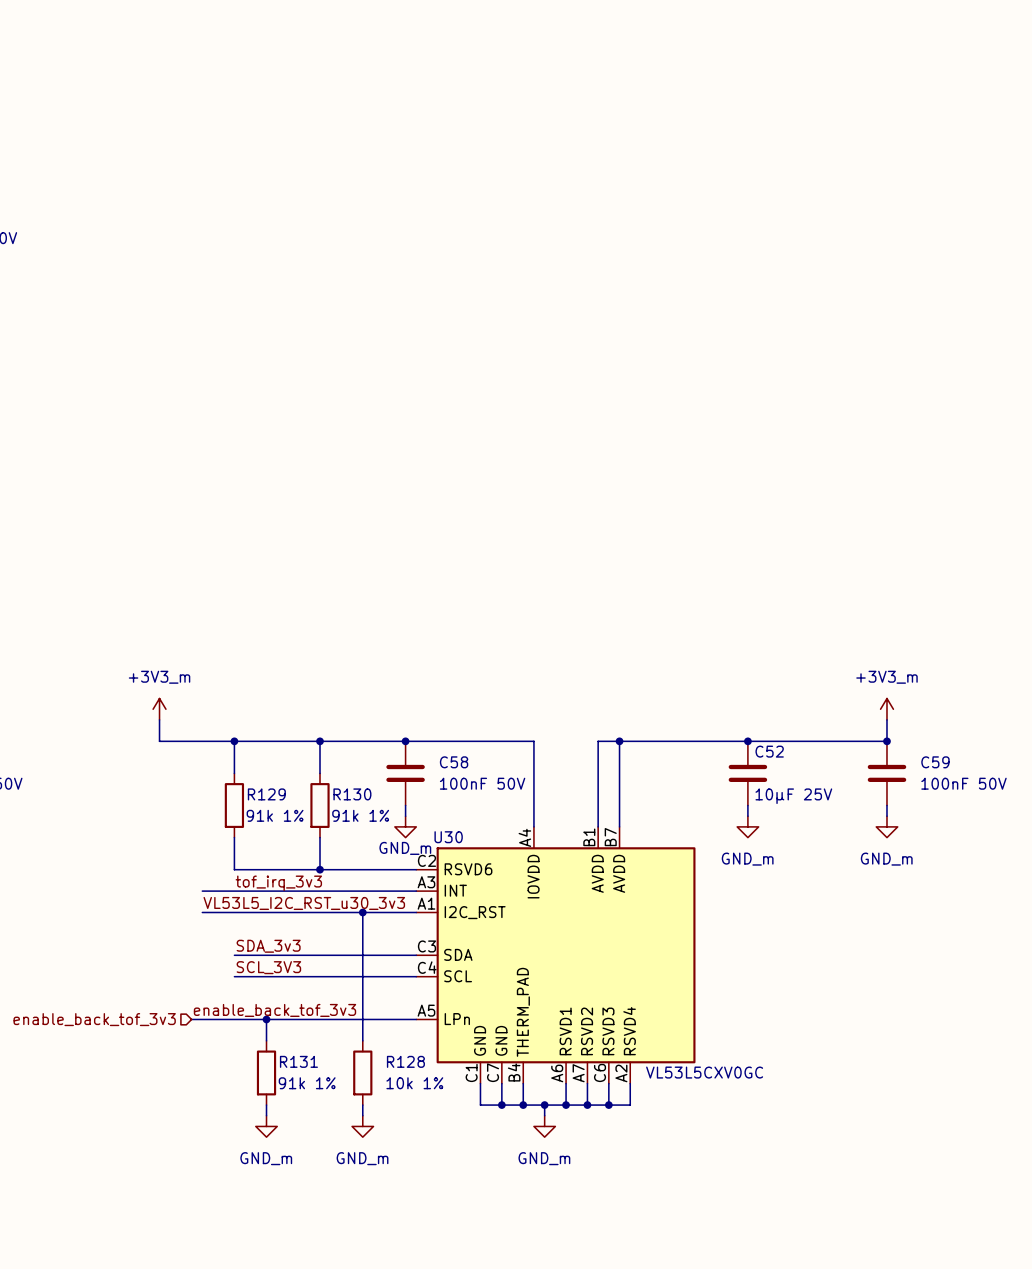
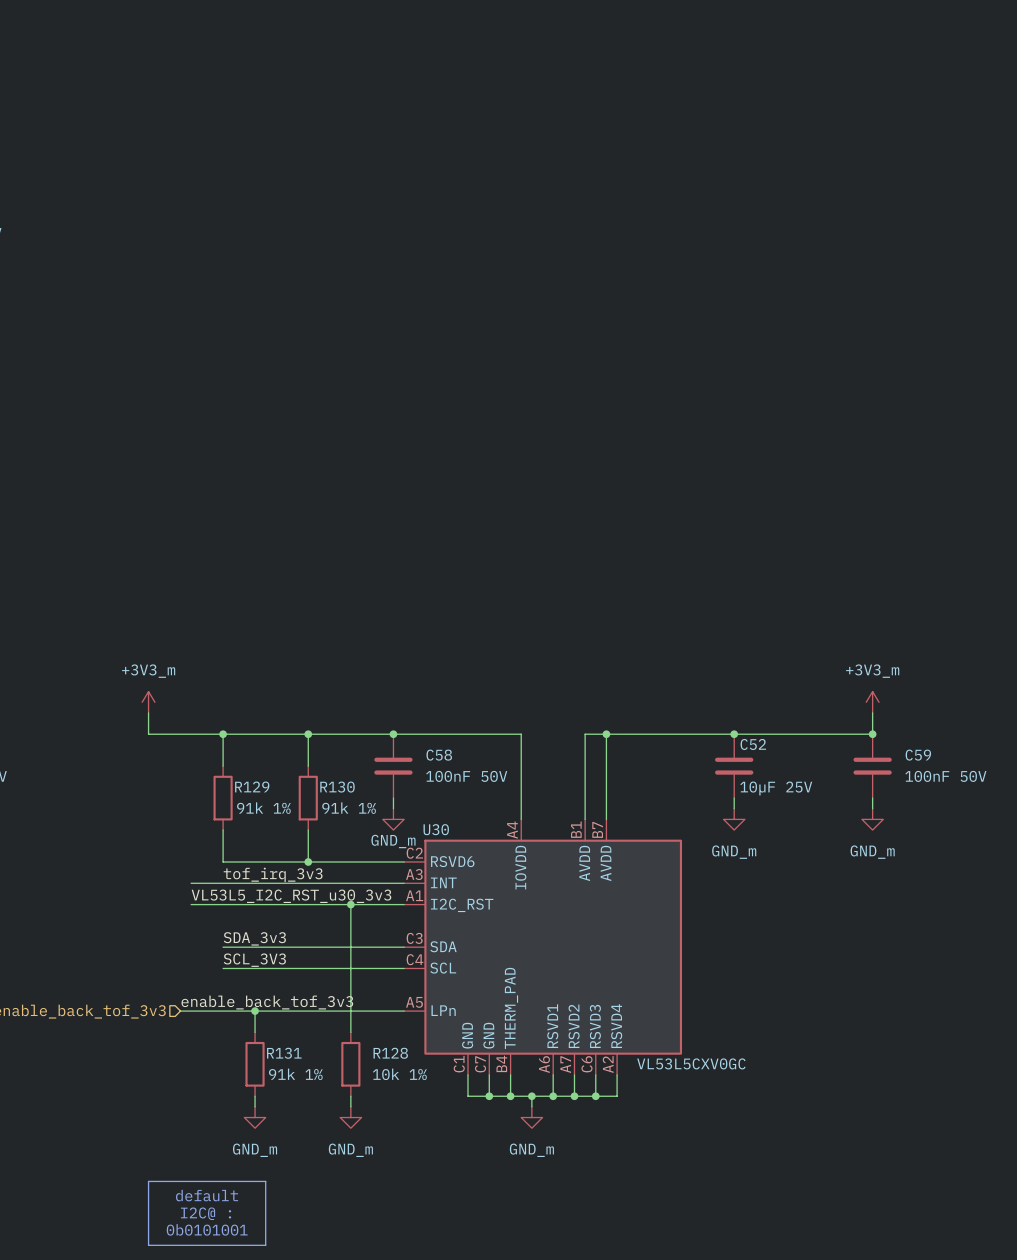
line: none -> (148, 1181) (265, 1181) (265, 1245) (148, 1245) (148, 1181)
text: none -> default (207, 1195)
text: none -> I2C@ : (206, 1213)
text: none -> 0b0101001 (207, 1229)

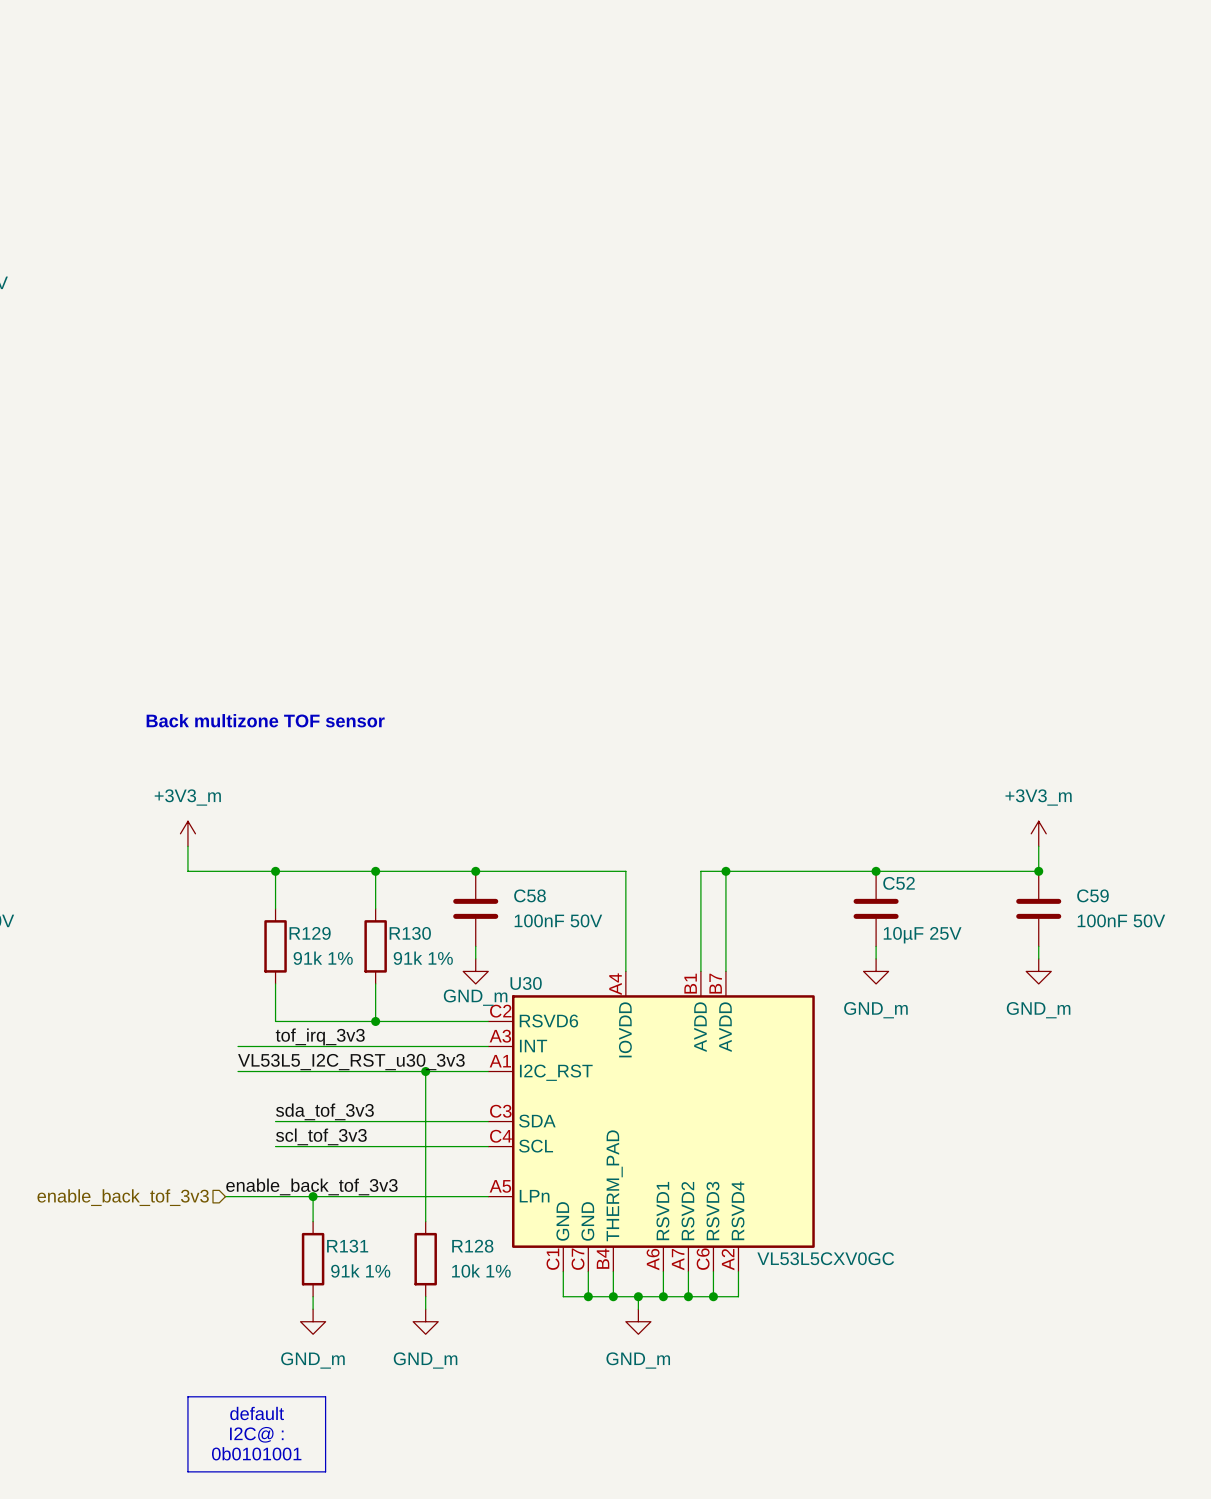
text: none -> Back multizone TOF sensor (265, 720)
label: SDA_3v3 (254, 938) -> sda_tof_3v3 (324, 1111)
label: SCL_3V3 (254, 960) -> scl_tof_3v3 (321, 1136)

